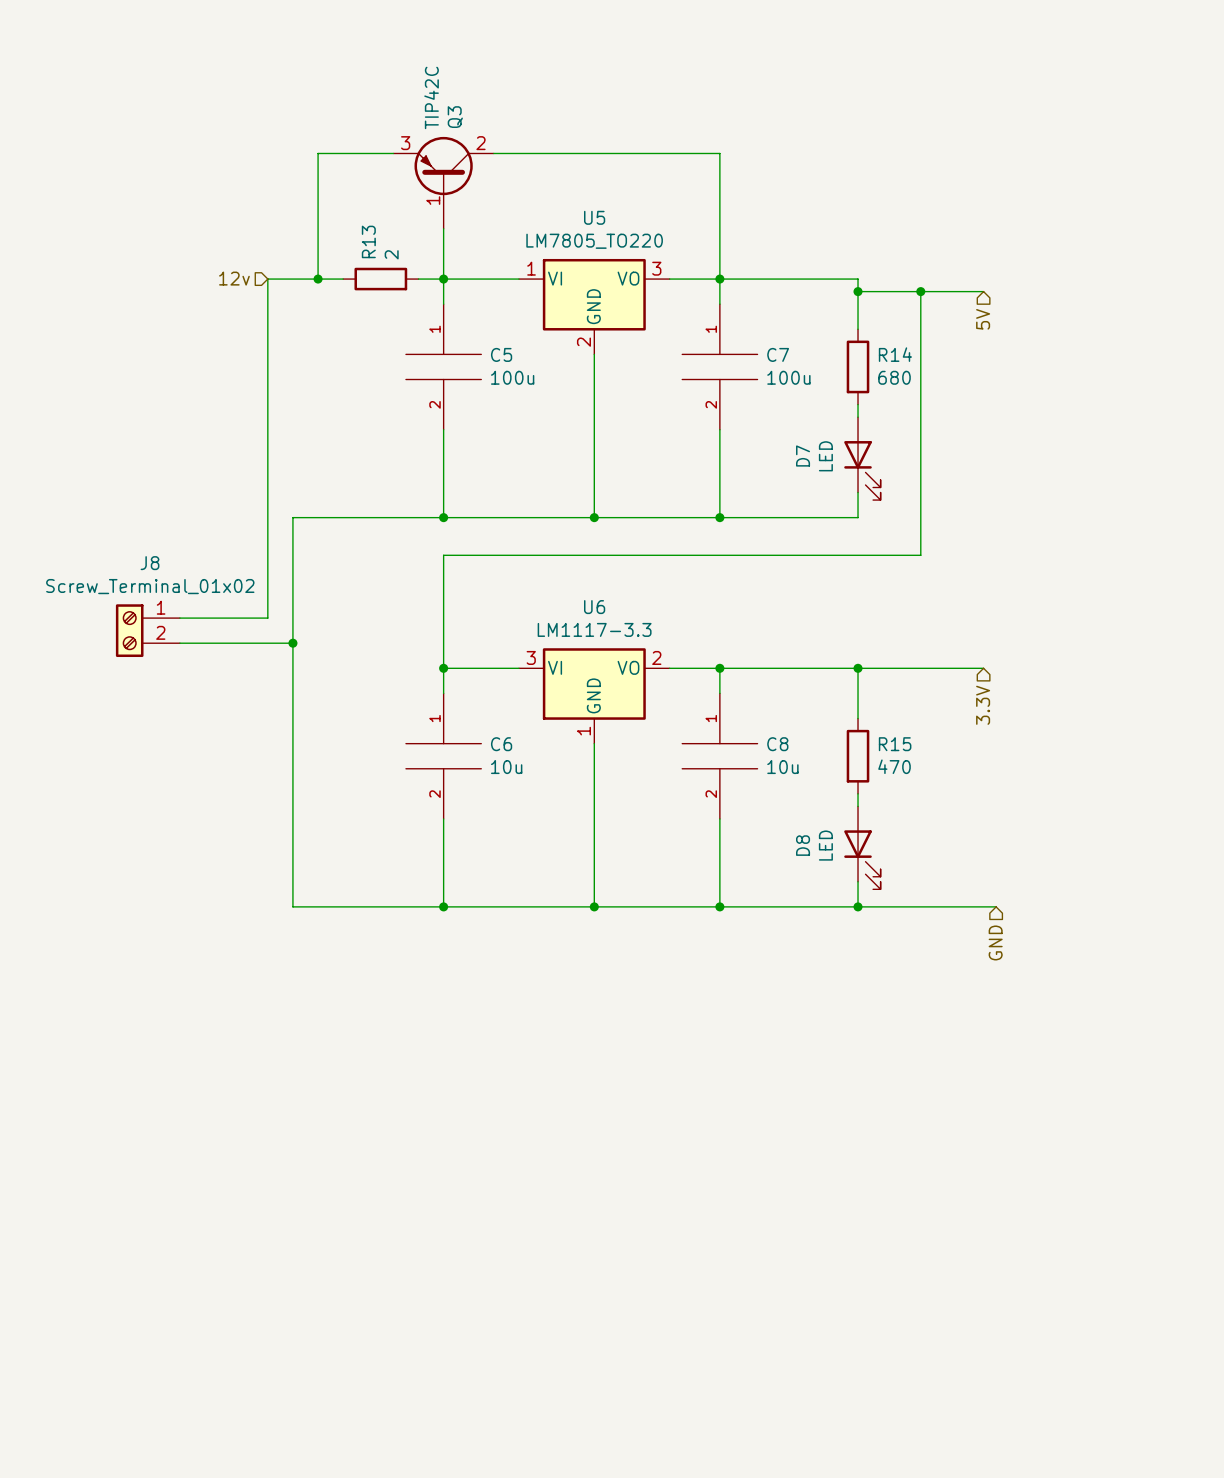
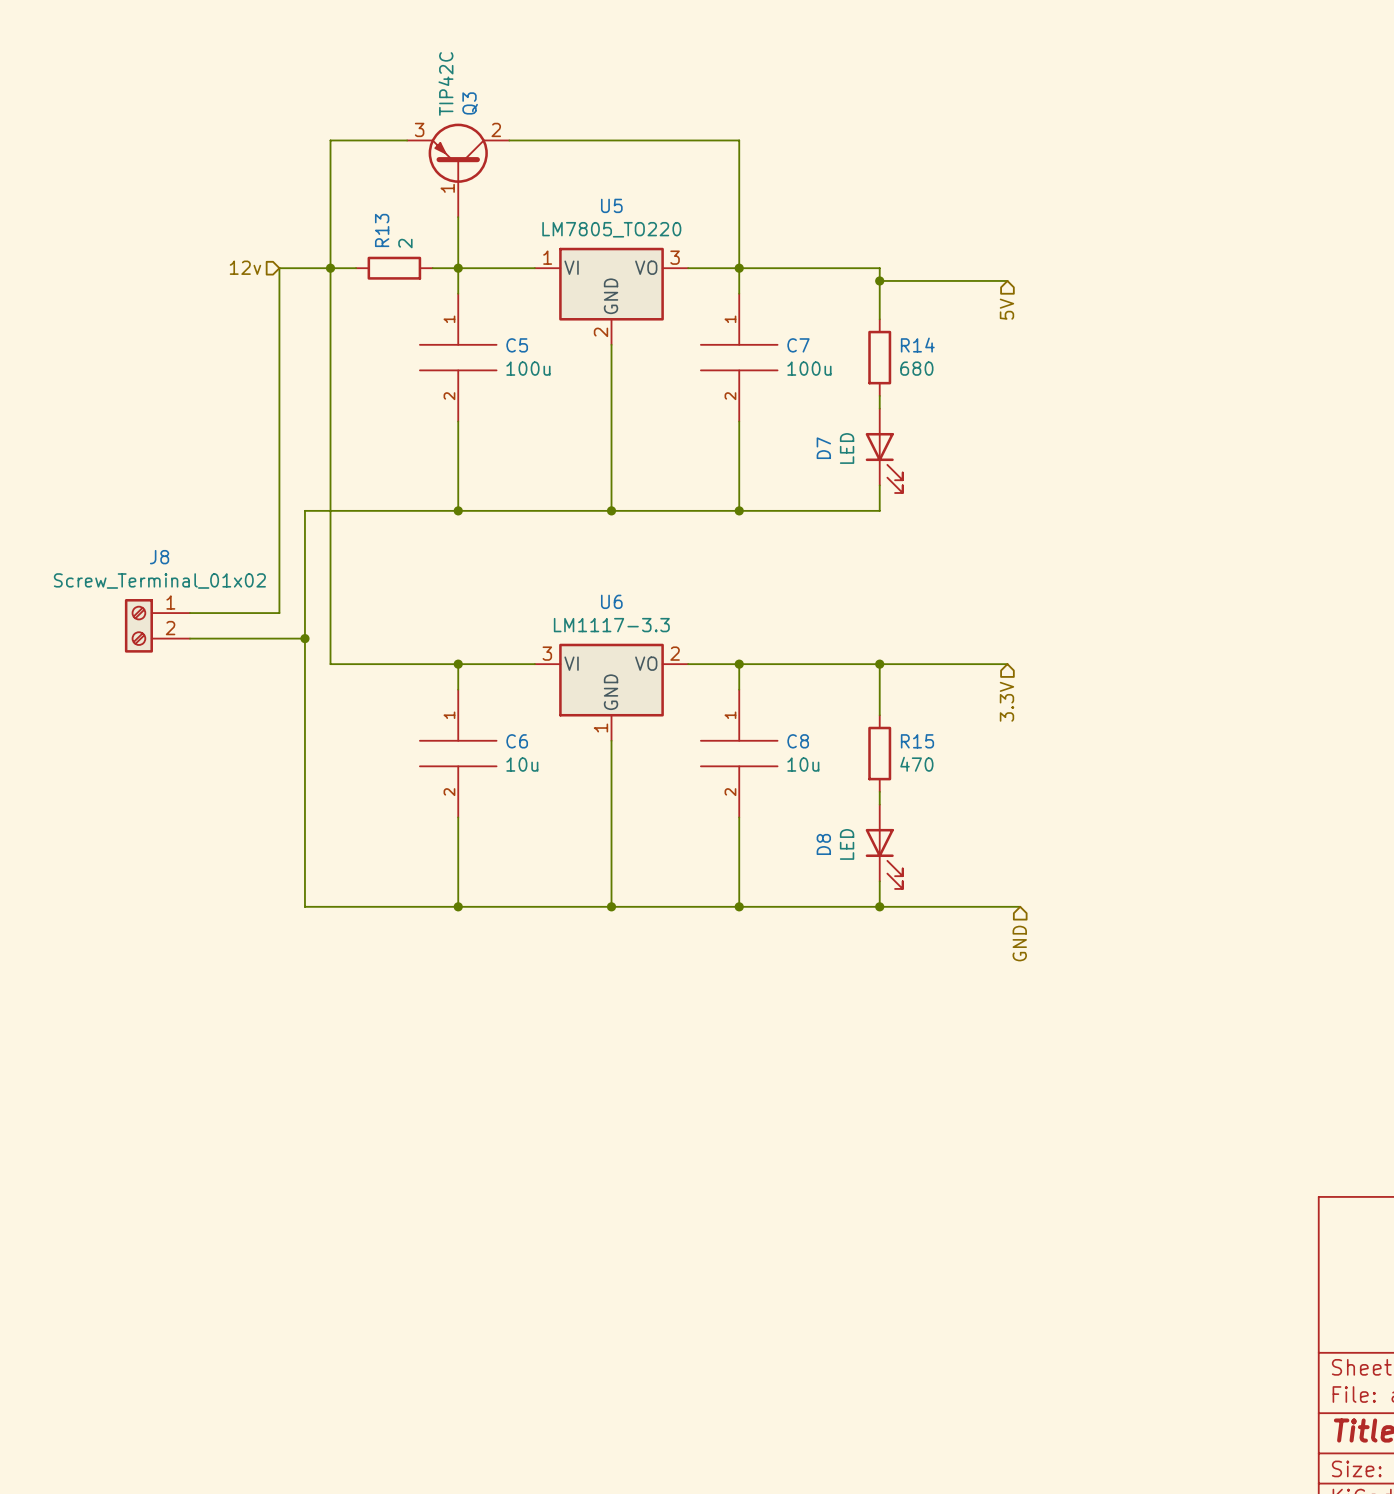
wire: (920, 291) (920, 555) (443, 555) (443, 668) -> (330, 268) (330, 664) (458, 664)
junction: (920, 291) -> none

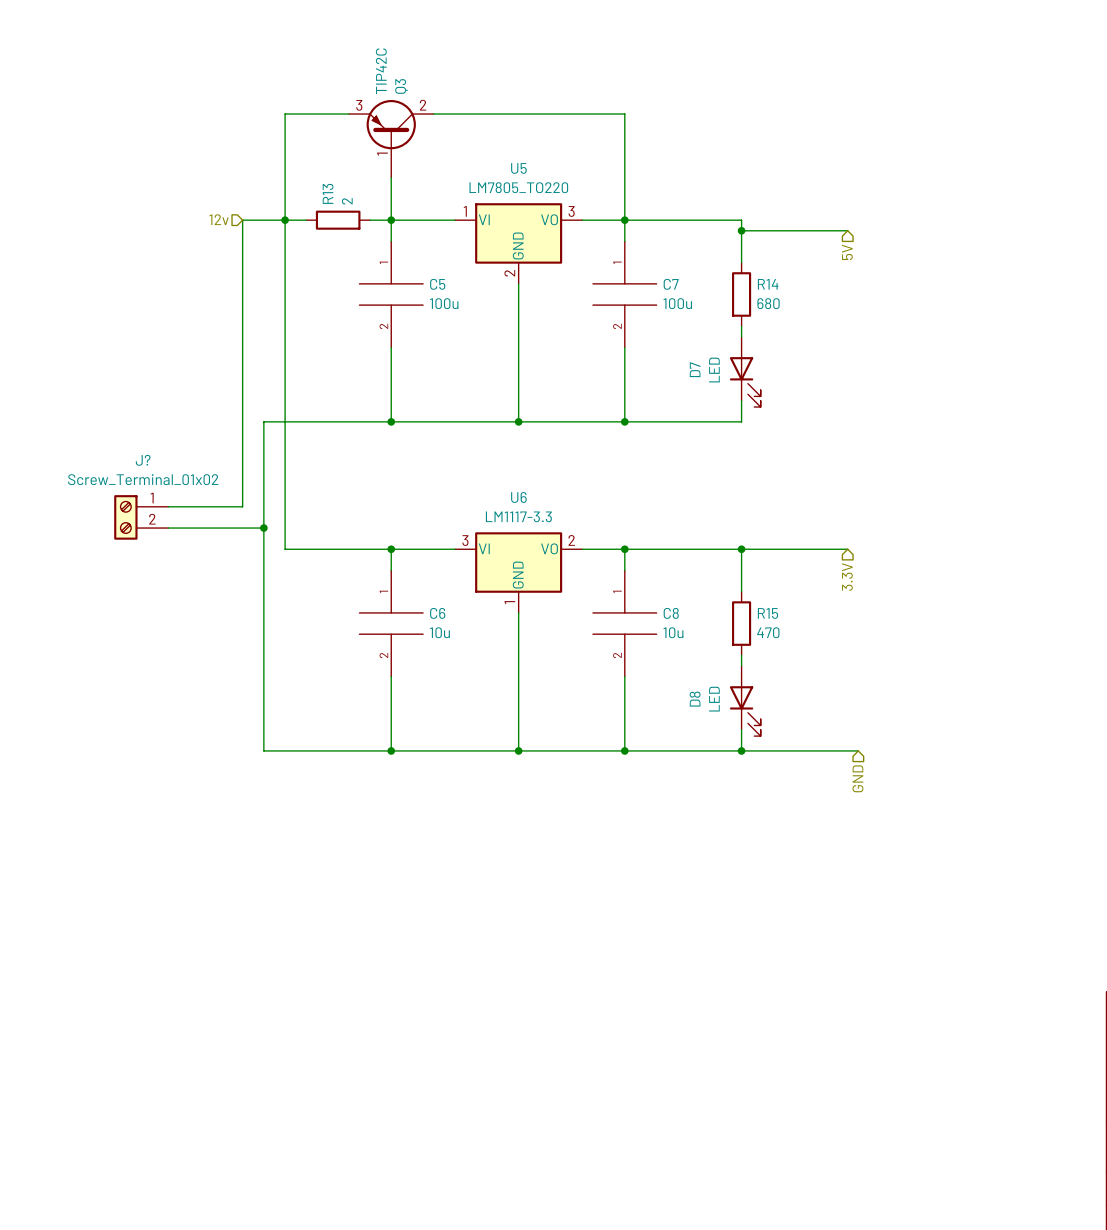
J8 name: J8 (159, 557) -> J? (143, 460)

